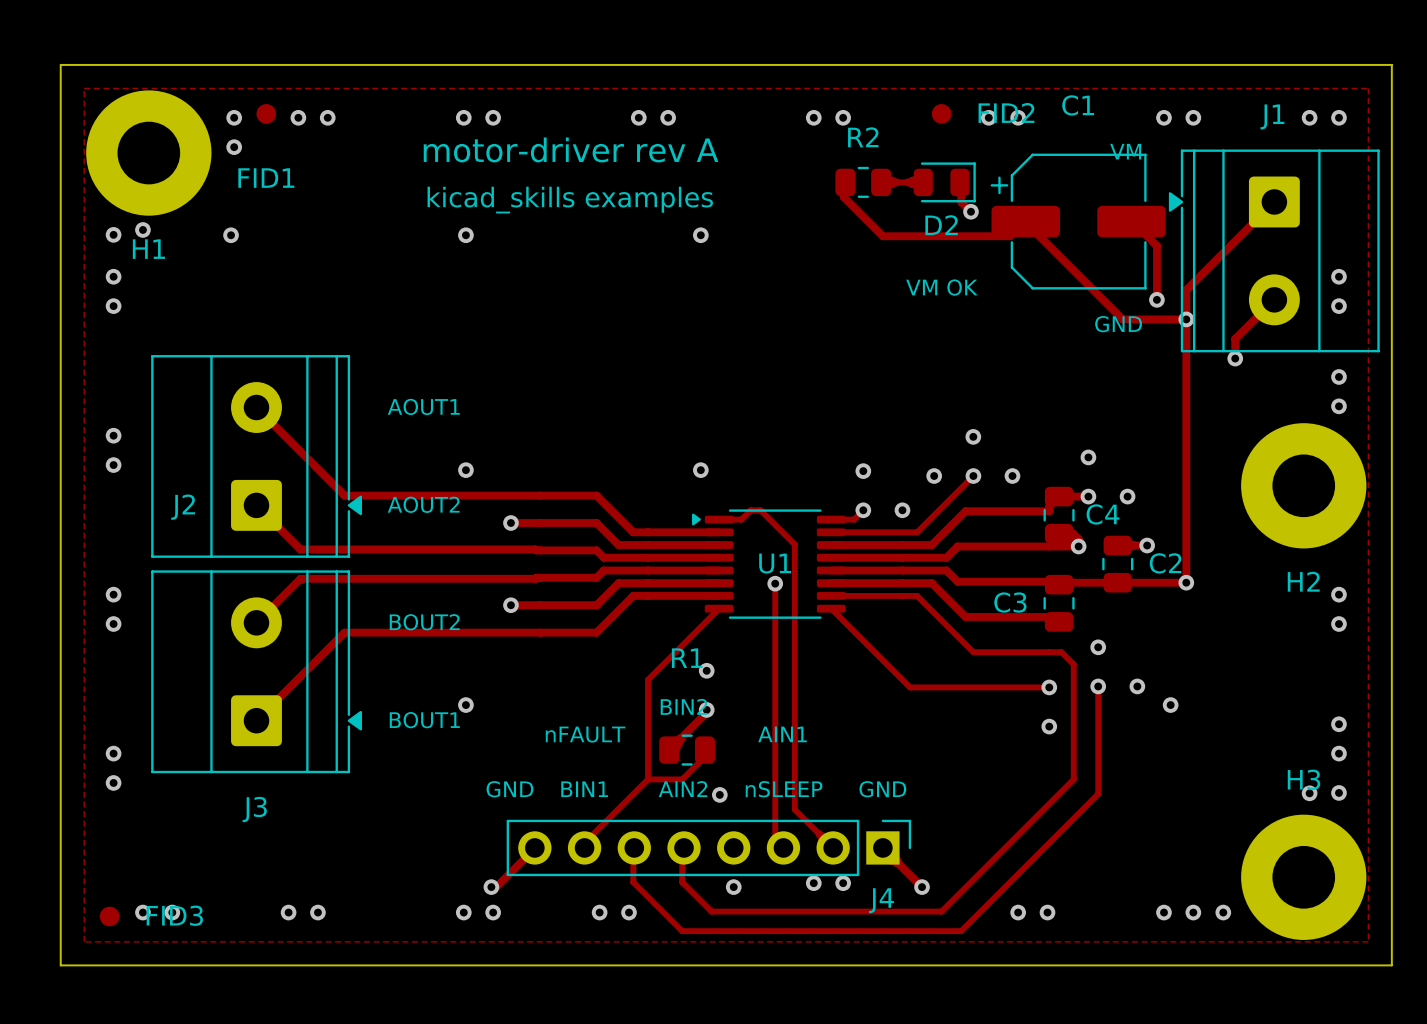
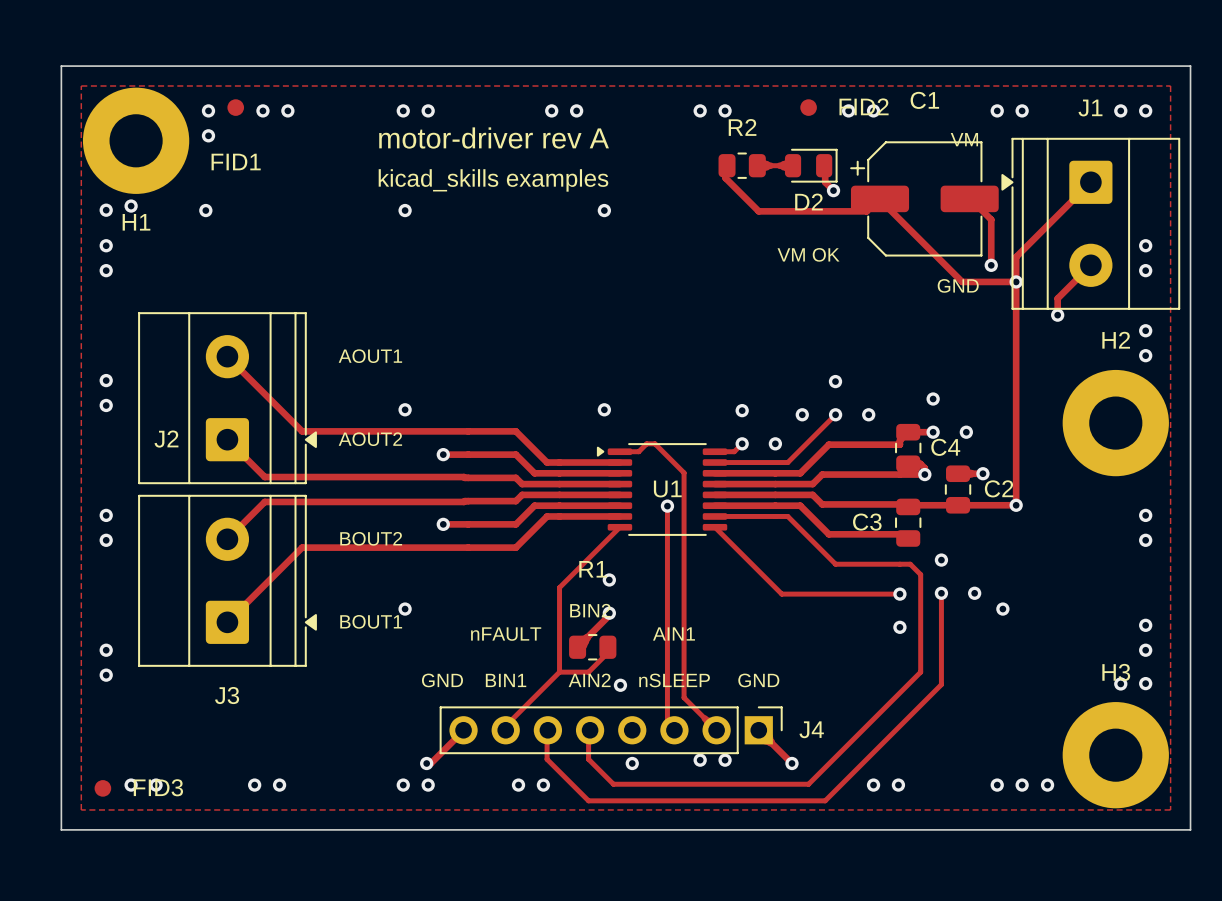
H2 name position: H2 (1303, 581) -> H2 (1116, 340)
J4 name position: J4 (881, 900) -> J4 (811, 729)

